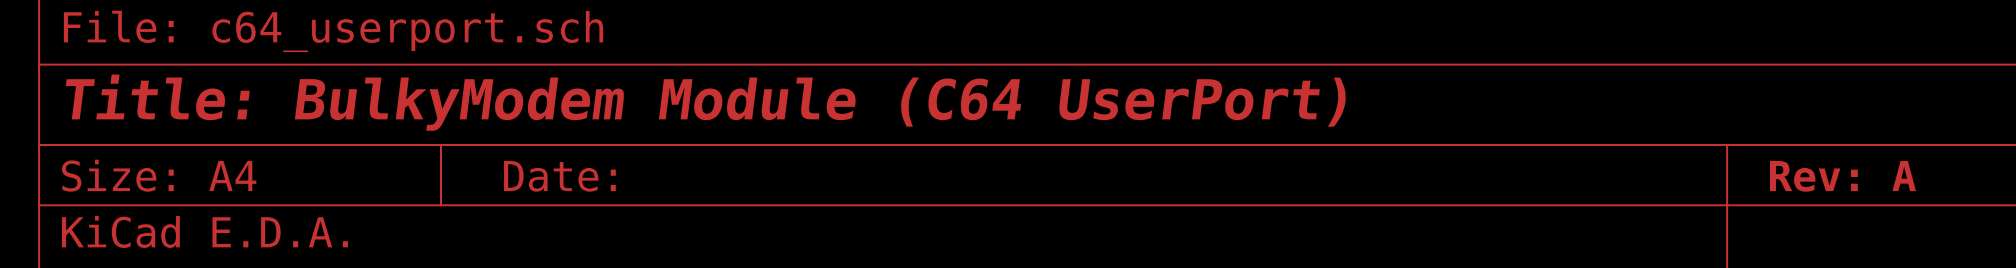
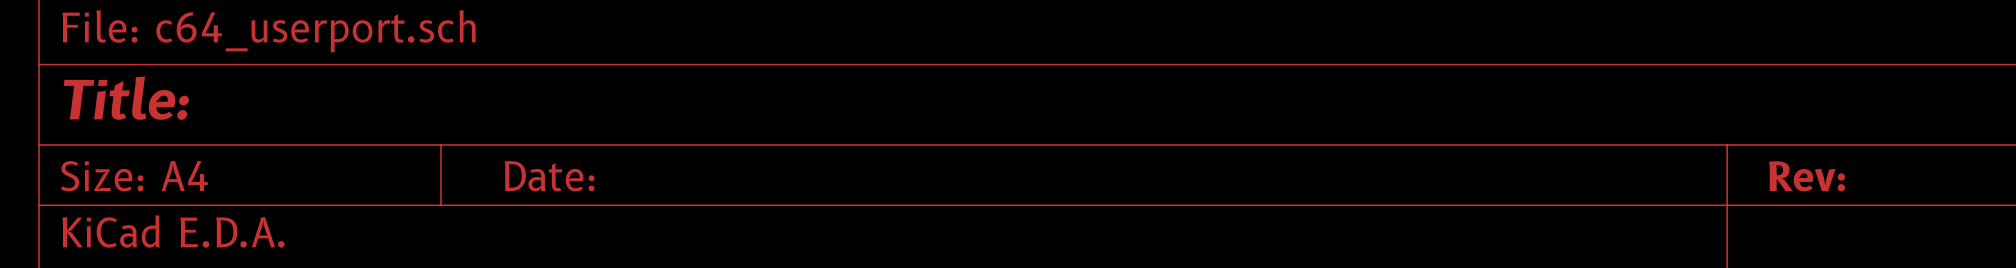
title block: Title: BulkyModem Module (C64 UserPort) (705, 102) -> Title: (126, 98)
title block: Rev: A (1843, 176) -> Rev: (1806, 176)

